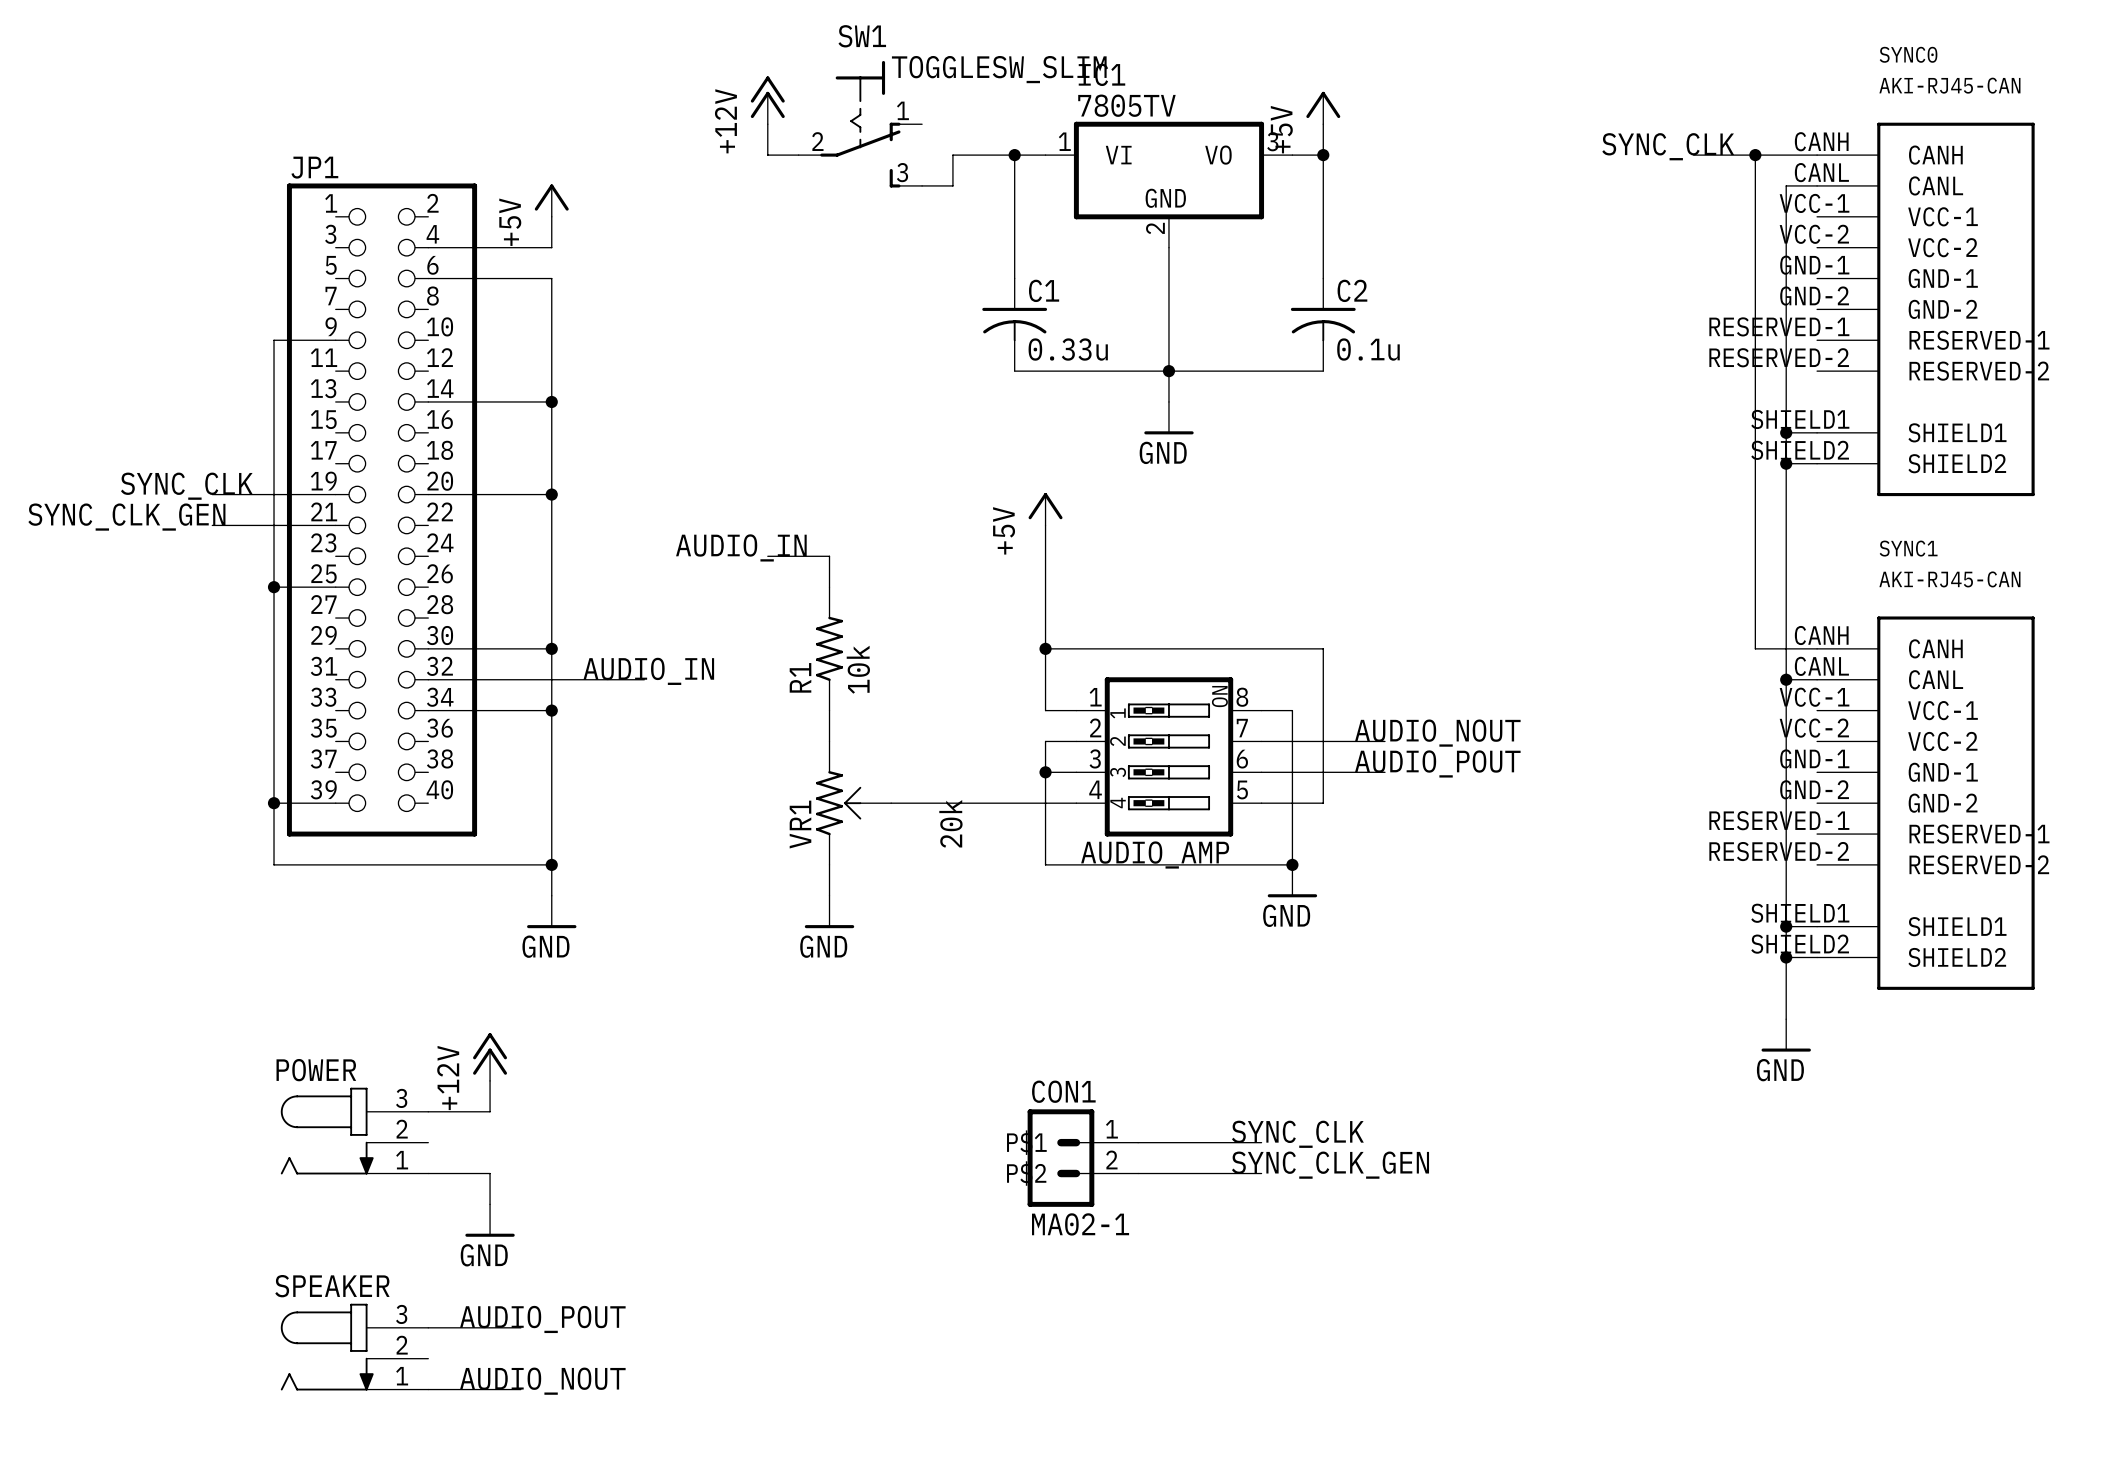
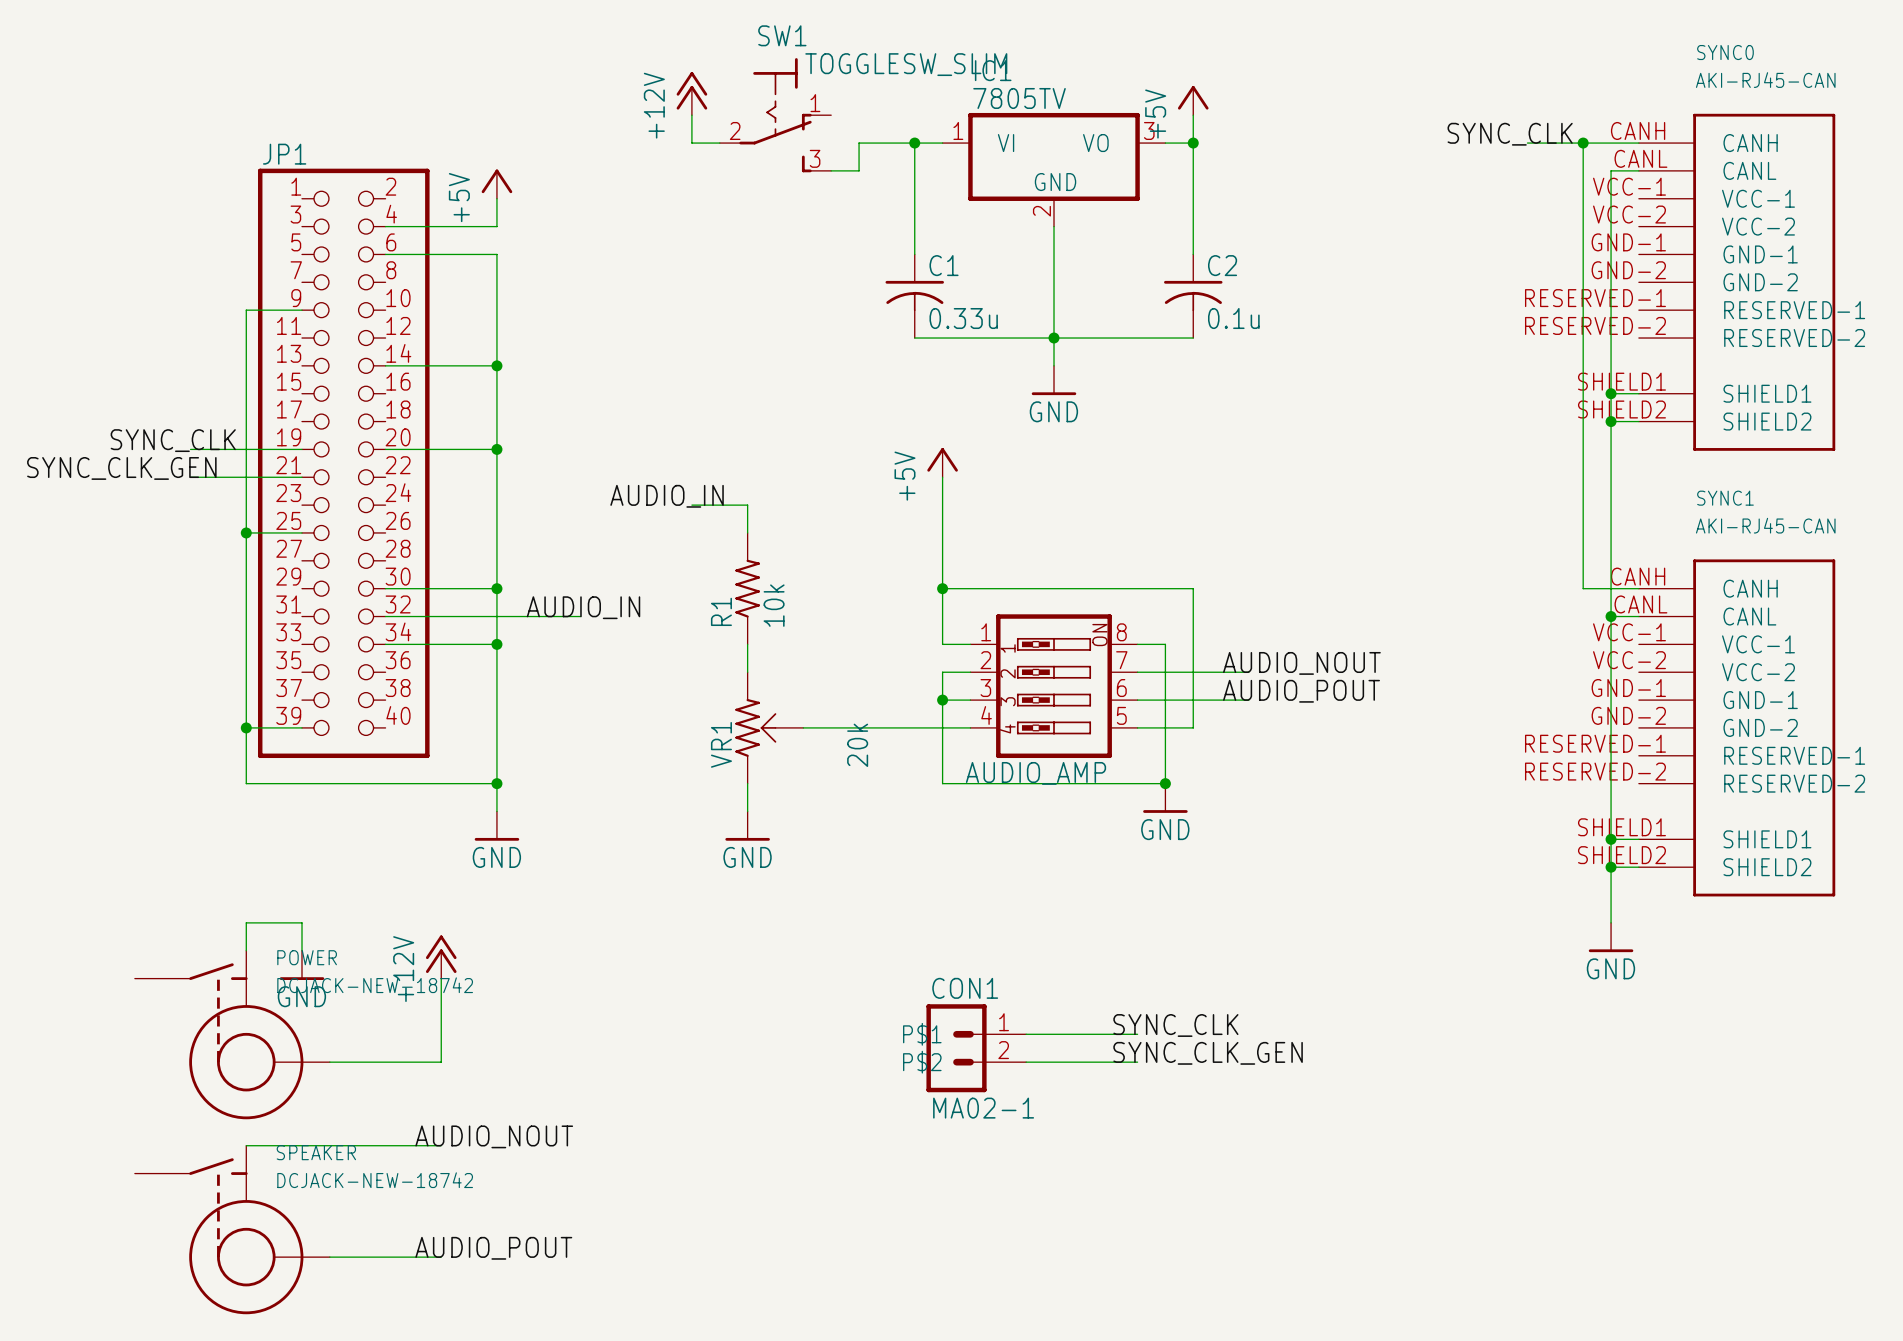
wire: none -> (246, 950) (246, 922) (302, 922) (302, 950)
wire: (428, 1111) (490, 1111) -> (441, 1062) (441, 1006)
POWER: (354, 1131) -> none
POWER: none -> DCJACK-NEW-18742 (232, 1035)
wire: (490, 1173) (490, 1204) -> none
power symbol position: GND (490, 1220) -> GND (302, 965)
label: none -> AUDIO_NOUT (494, 1136)
wire: none -> (246, 1145) (441, 1145)
label: AUDIO_POUT (542, 1319) -> none
wire: (428, 1327) (520, 1327) -> none
SPEAKER: (354, 1347) -> none
SPEAKER: none -> DCJACK-NEW-18742 (232, 1229)
label: AUDIO_NOUT (542, 1381) -> AUDIO_POUT (493, 1248)
wire: (490, 1389) (520, 1389) -> none

